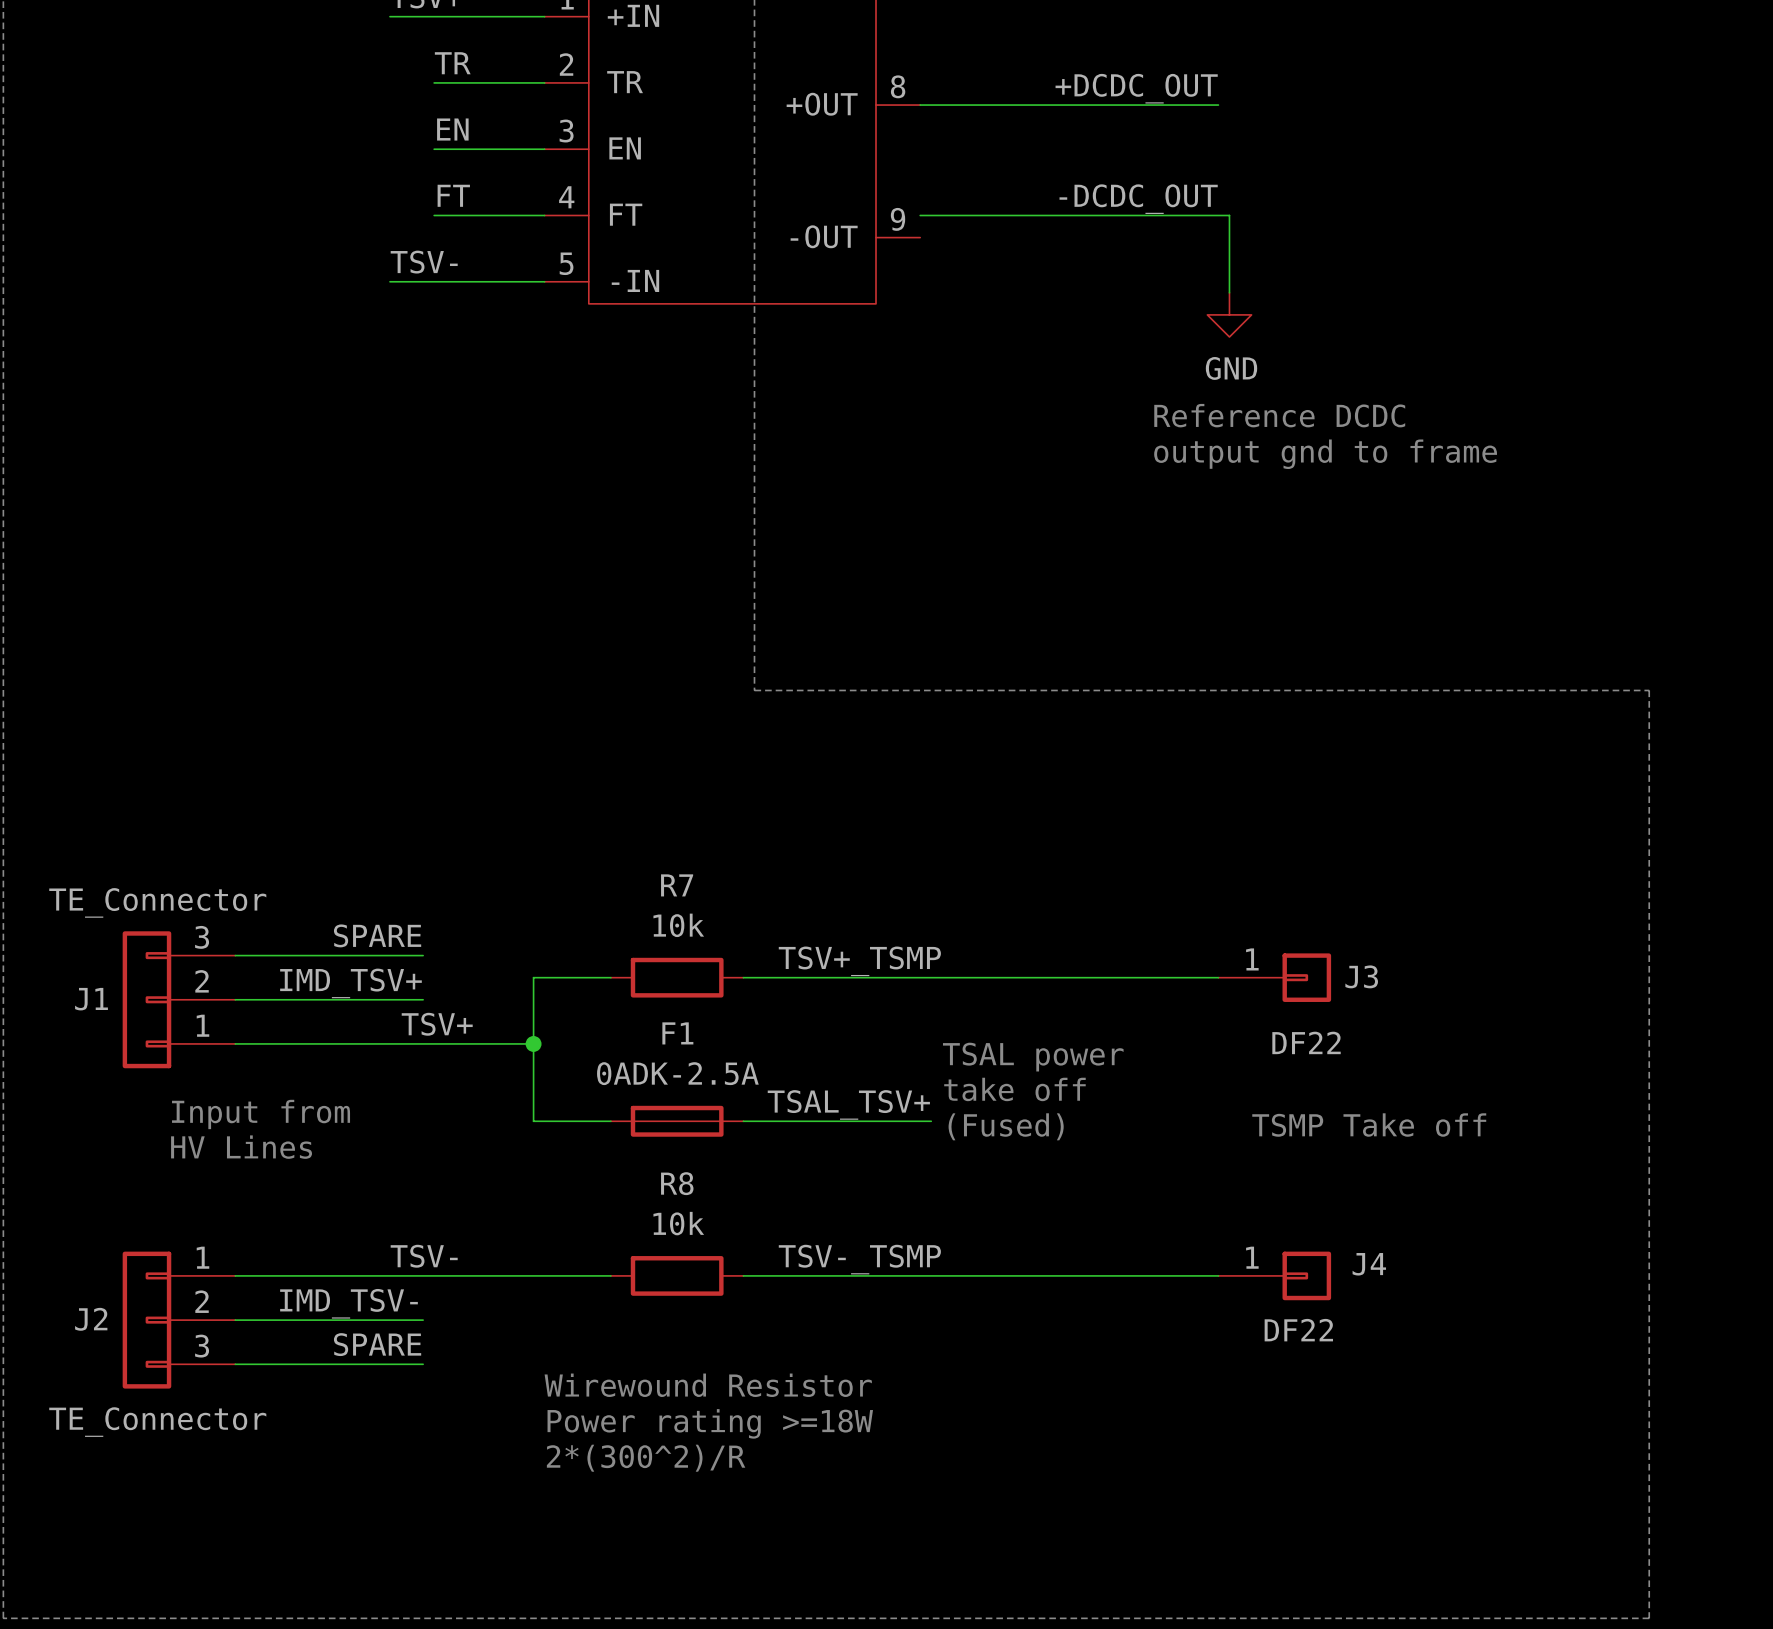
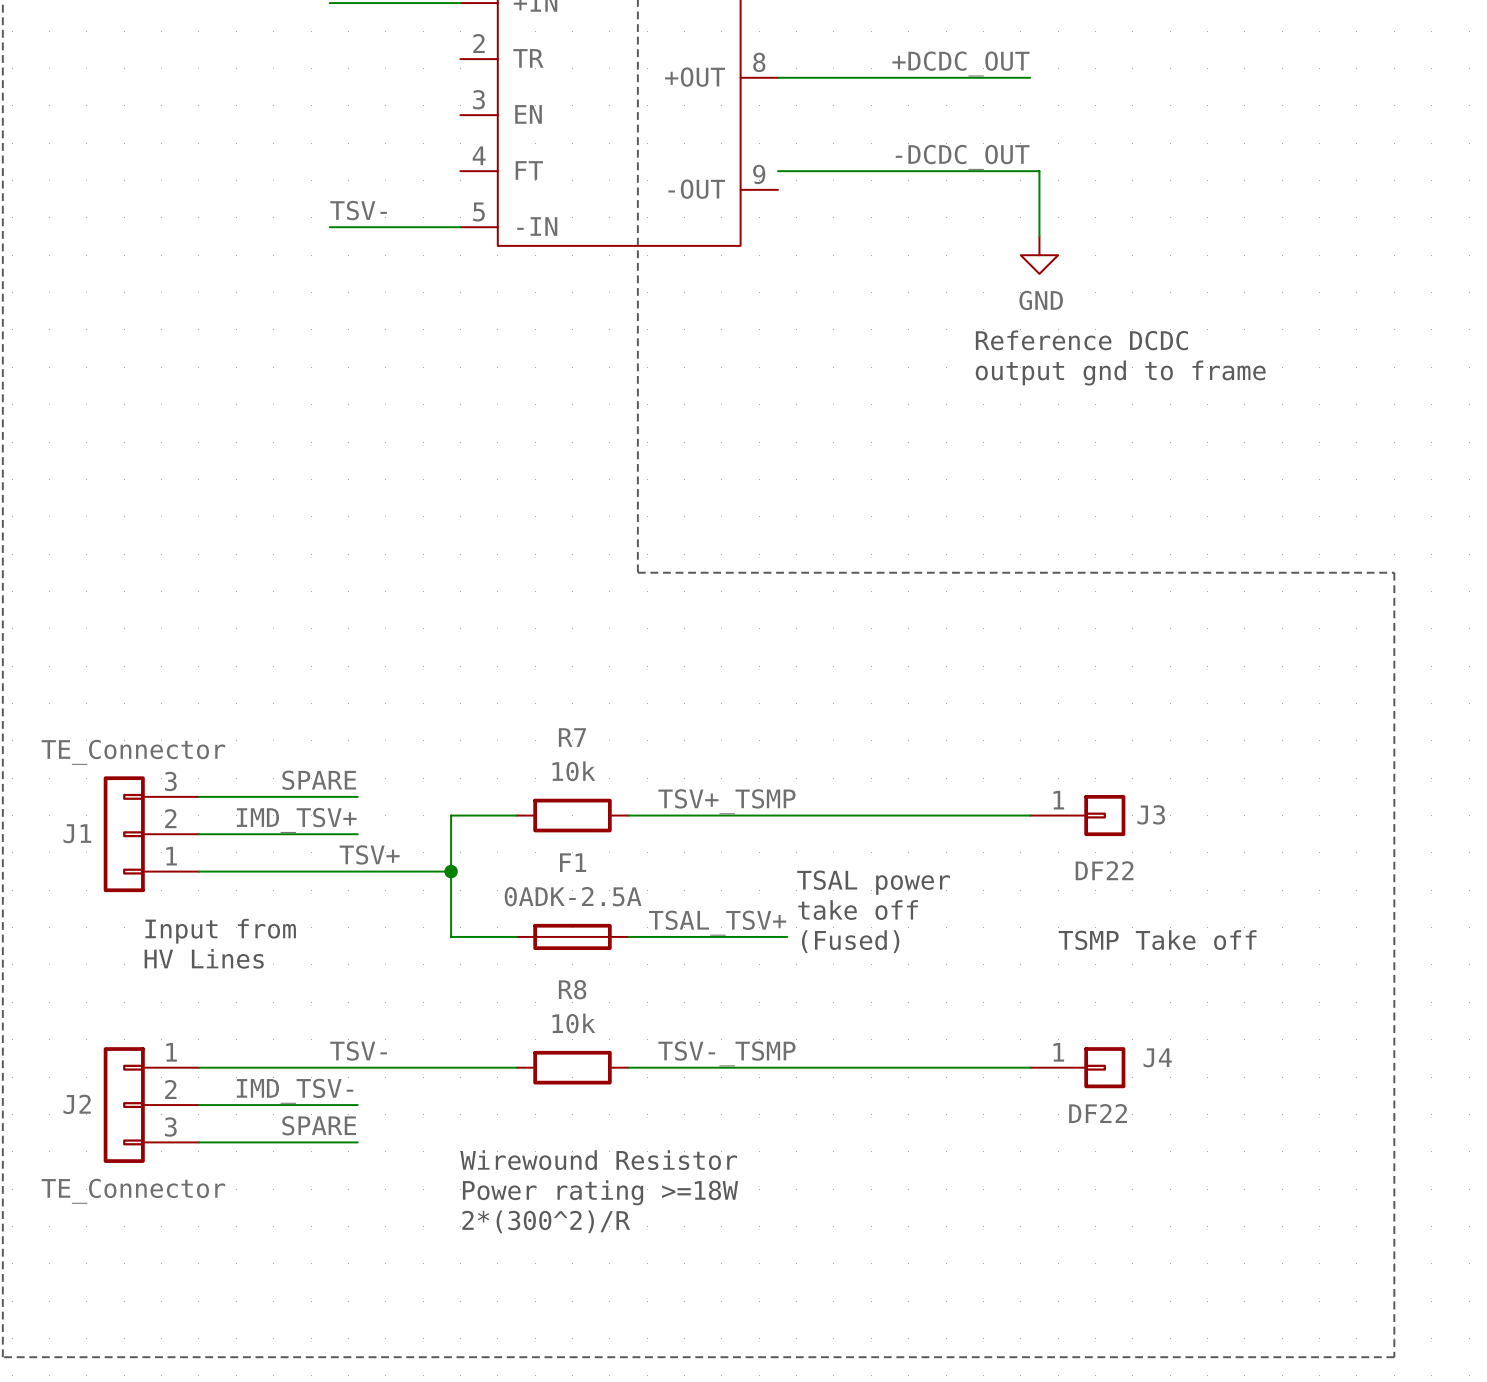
label: TR (452, 63) -> none
wire: (434, 82) (544, 82) -> none
label: EN (452, 129) -> none
wire: (434, 149) (544, 149) -> none
label: FT (453, 195) -> none
wire: (434, 215) (544, 215) -> none

